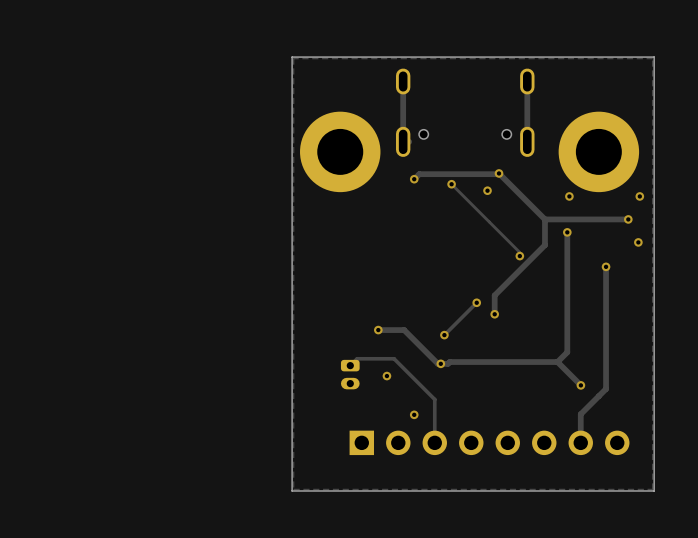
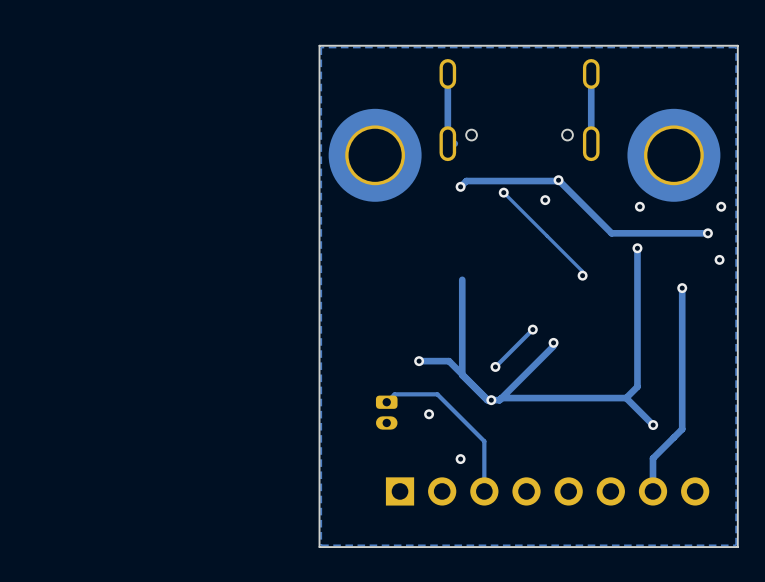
track: (544, 219) (544, 245) (494, 295) (494, 314) -> none
track: none -> (462, 279) (462, 375) (488, 400)
track: none -> (553, 346) (501, 398)

